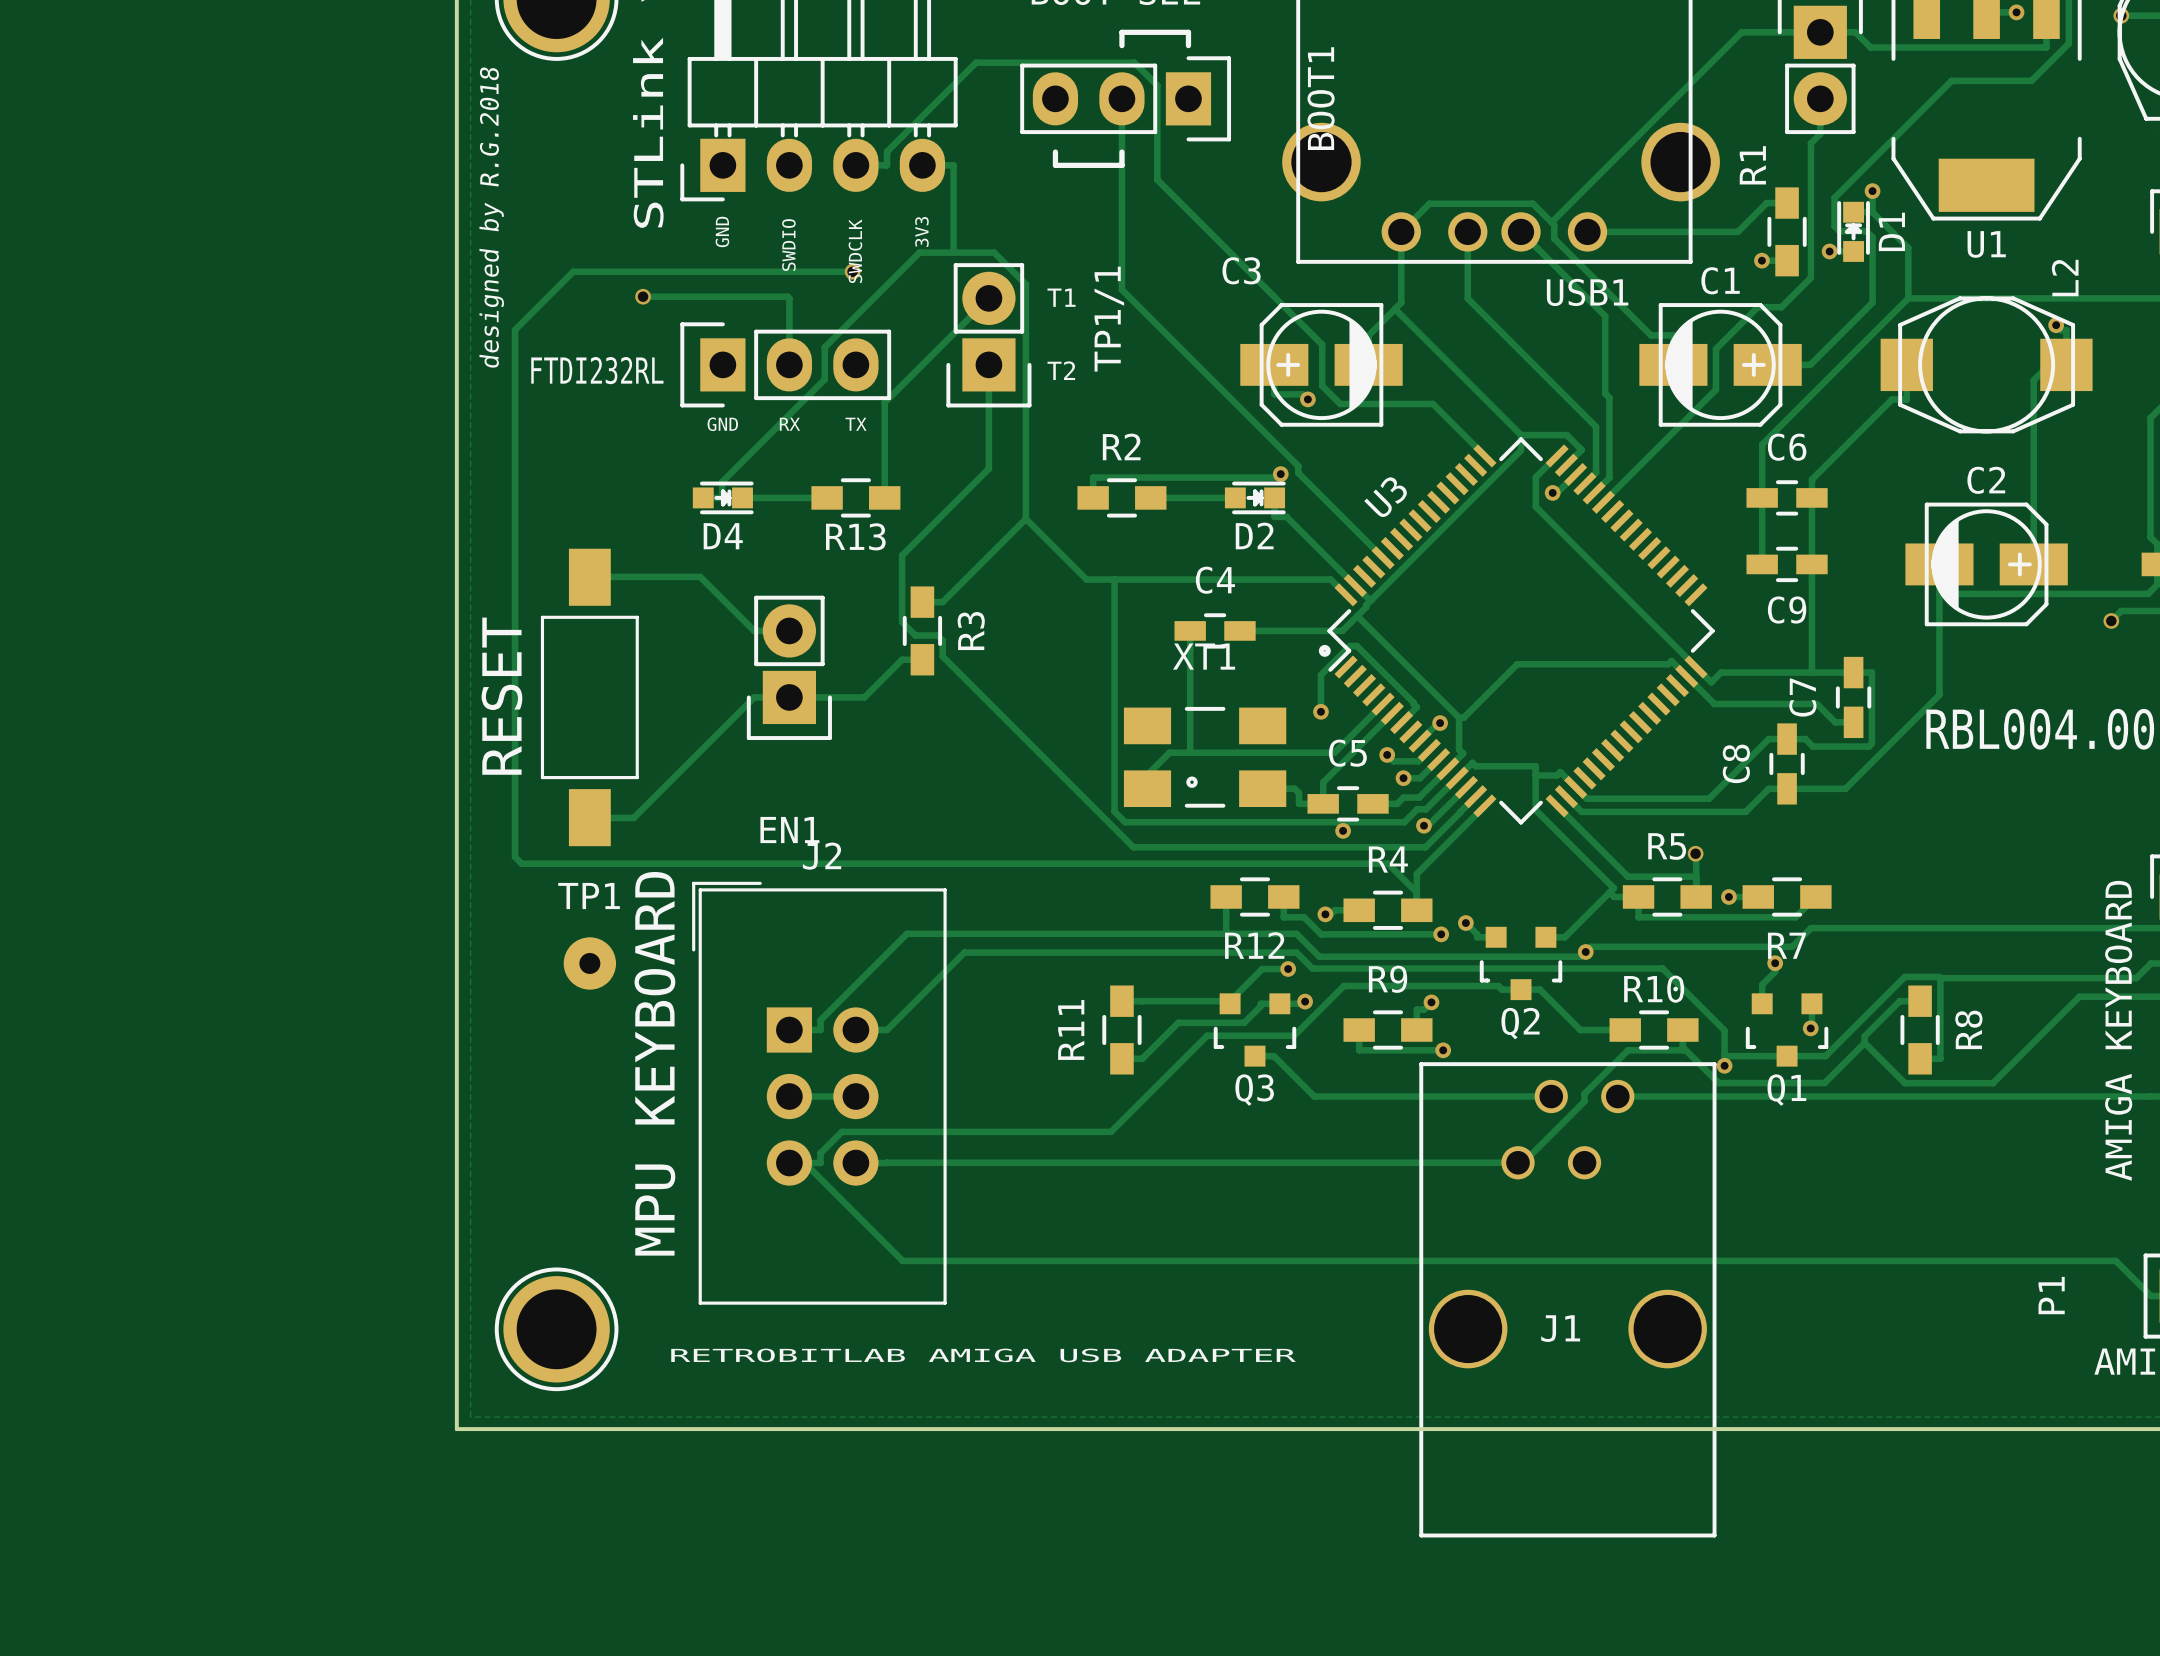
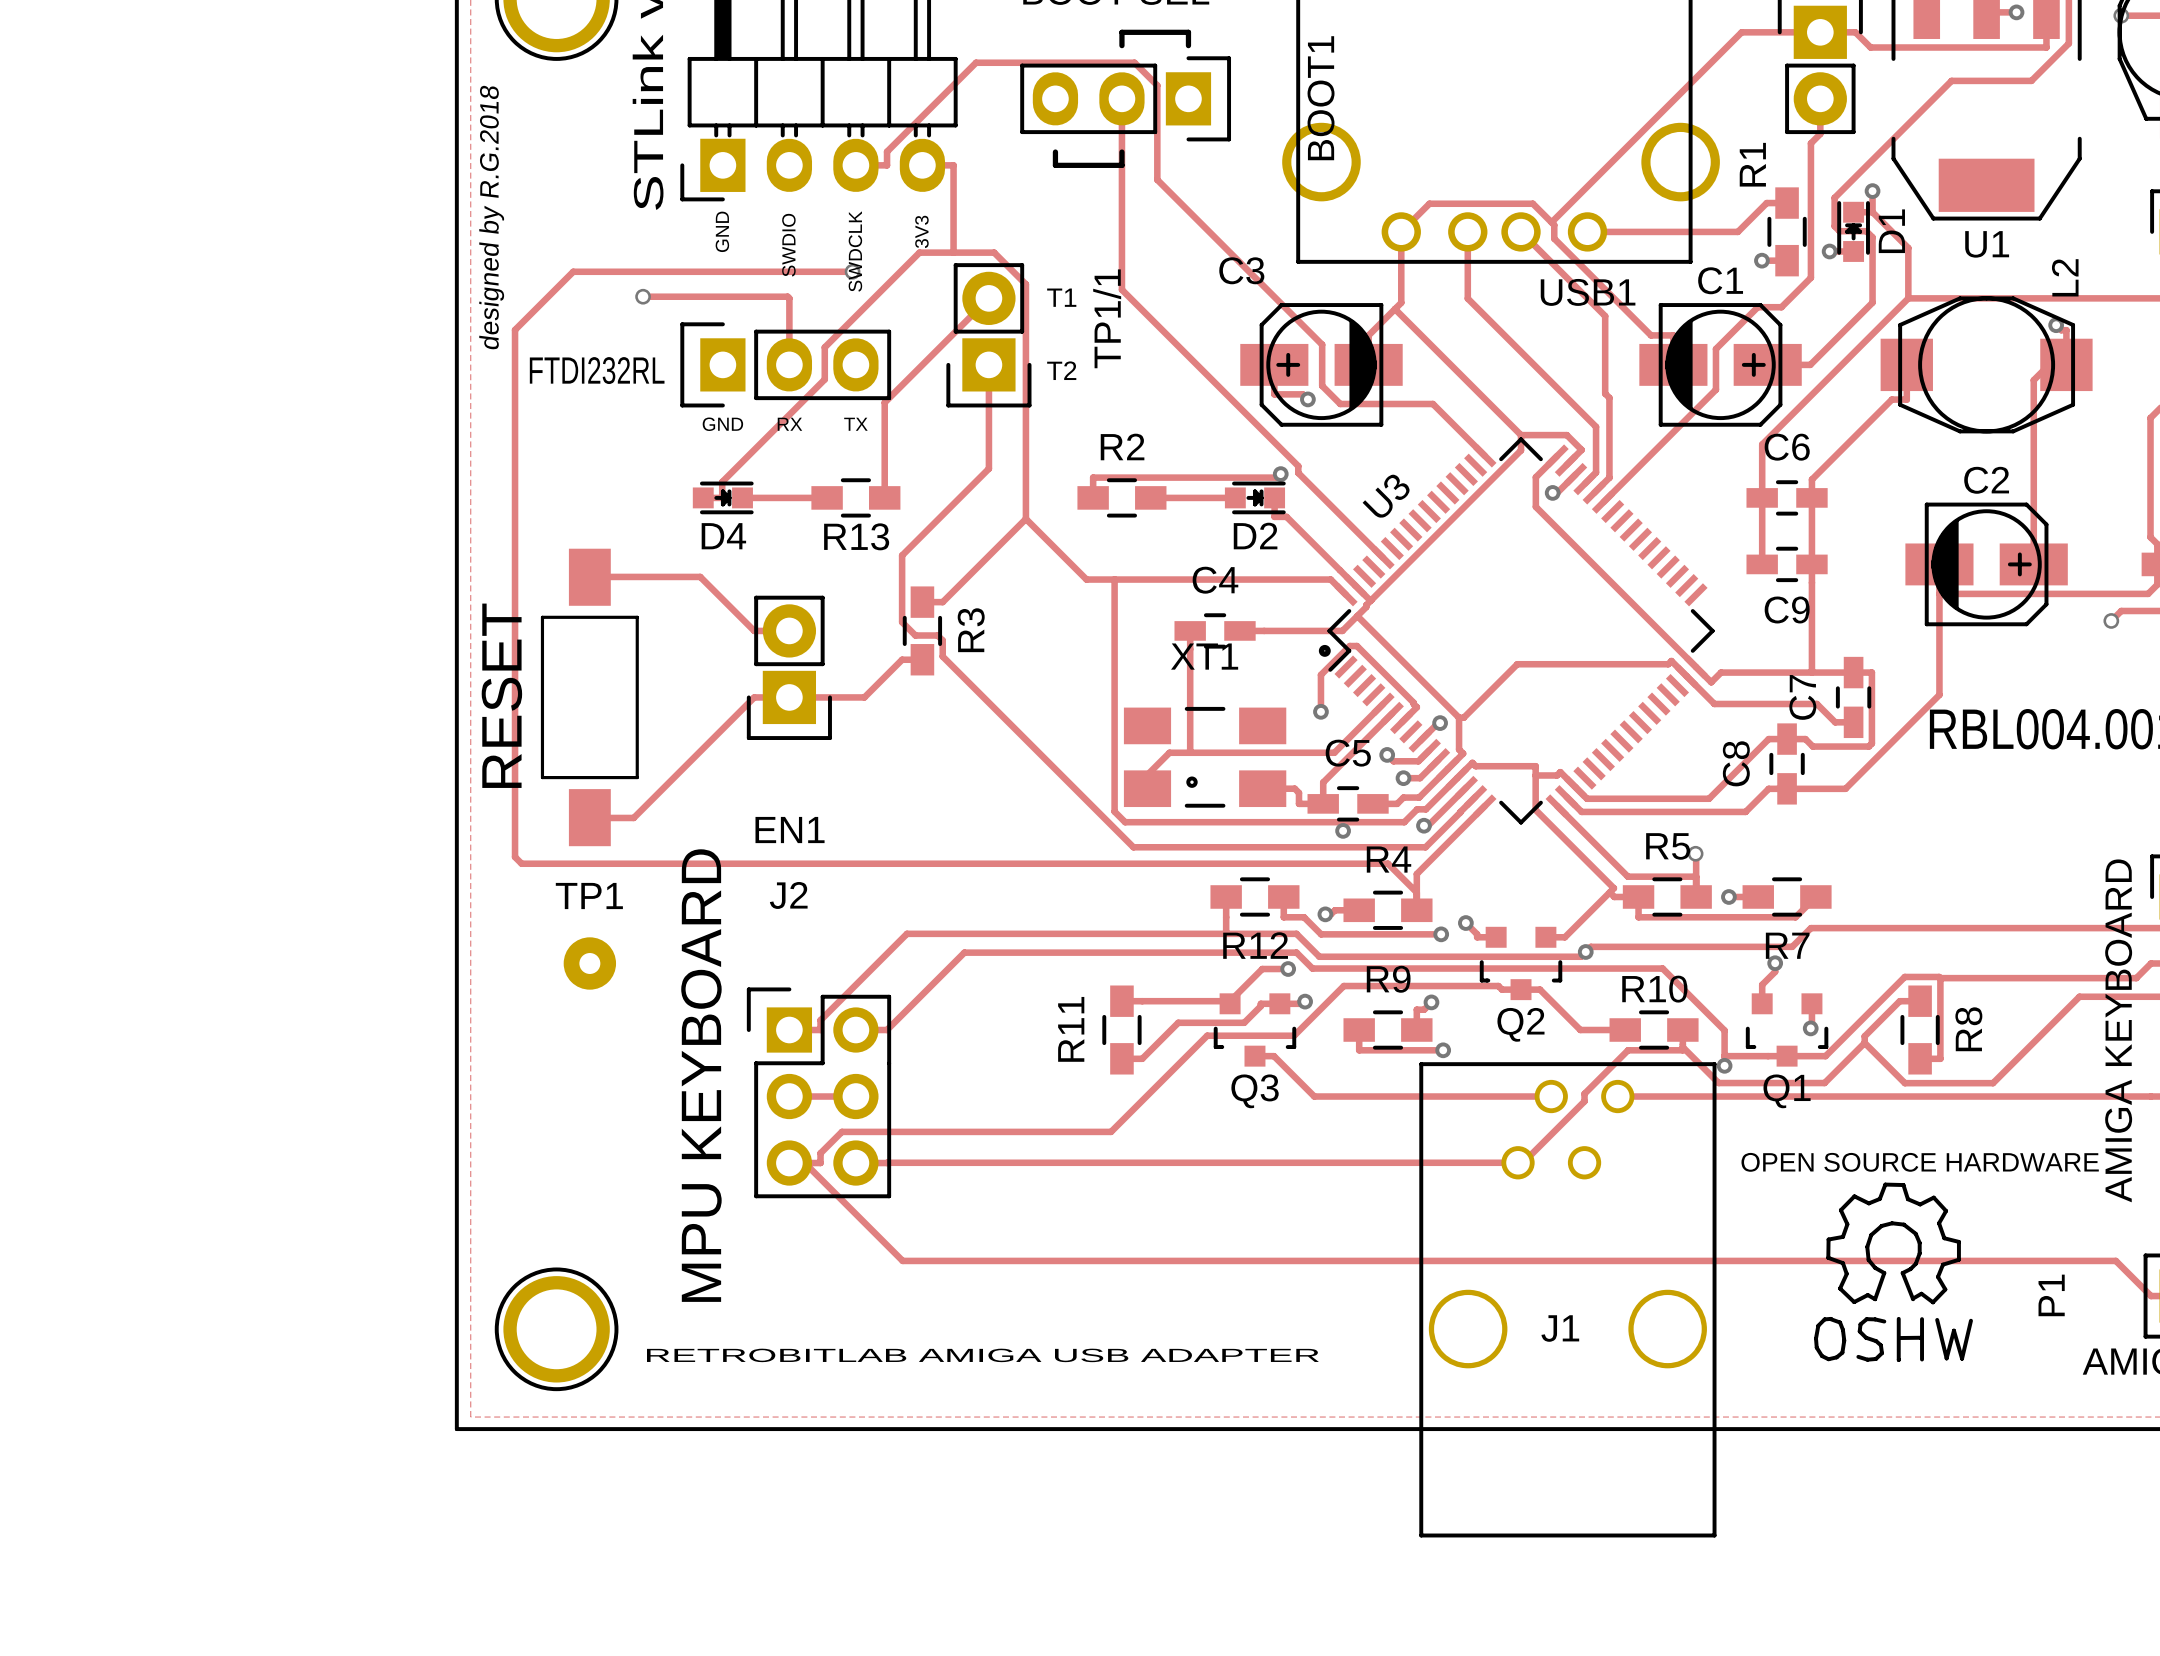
J2 footprint: [692, 881, 947, 1305] -> [746, 987, 892, 1199]
text position: MPU KEYBOARD (654, 1063) -> MPU KEYBOARD (701, 1075)
OPEN SOURCE HARDWARE: none -> (1893, 1272)

